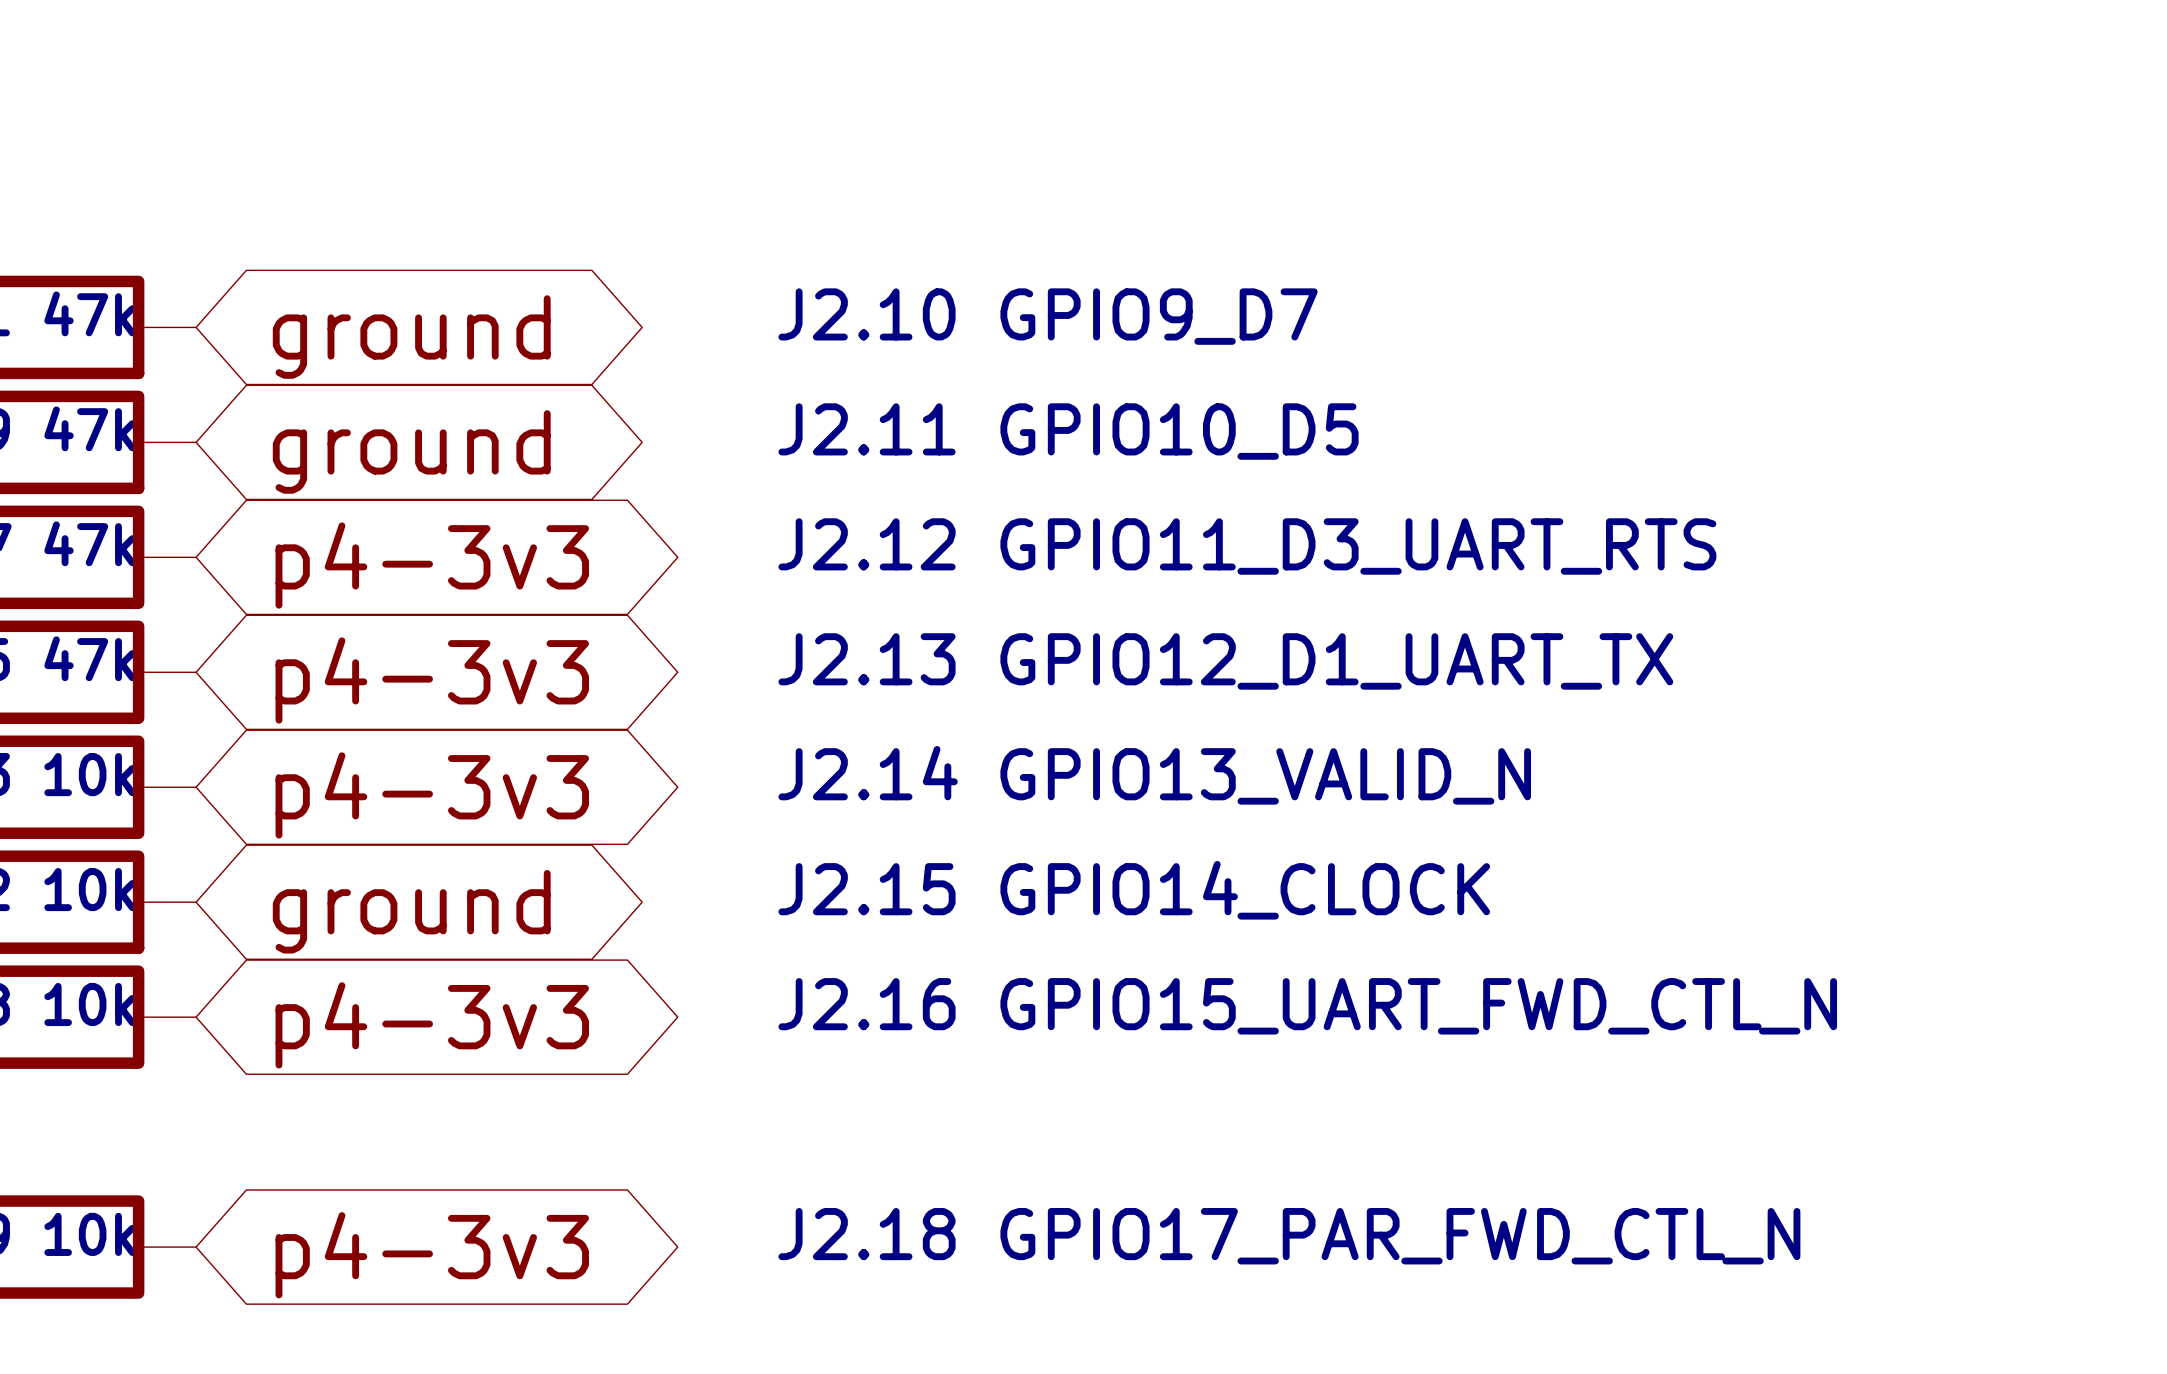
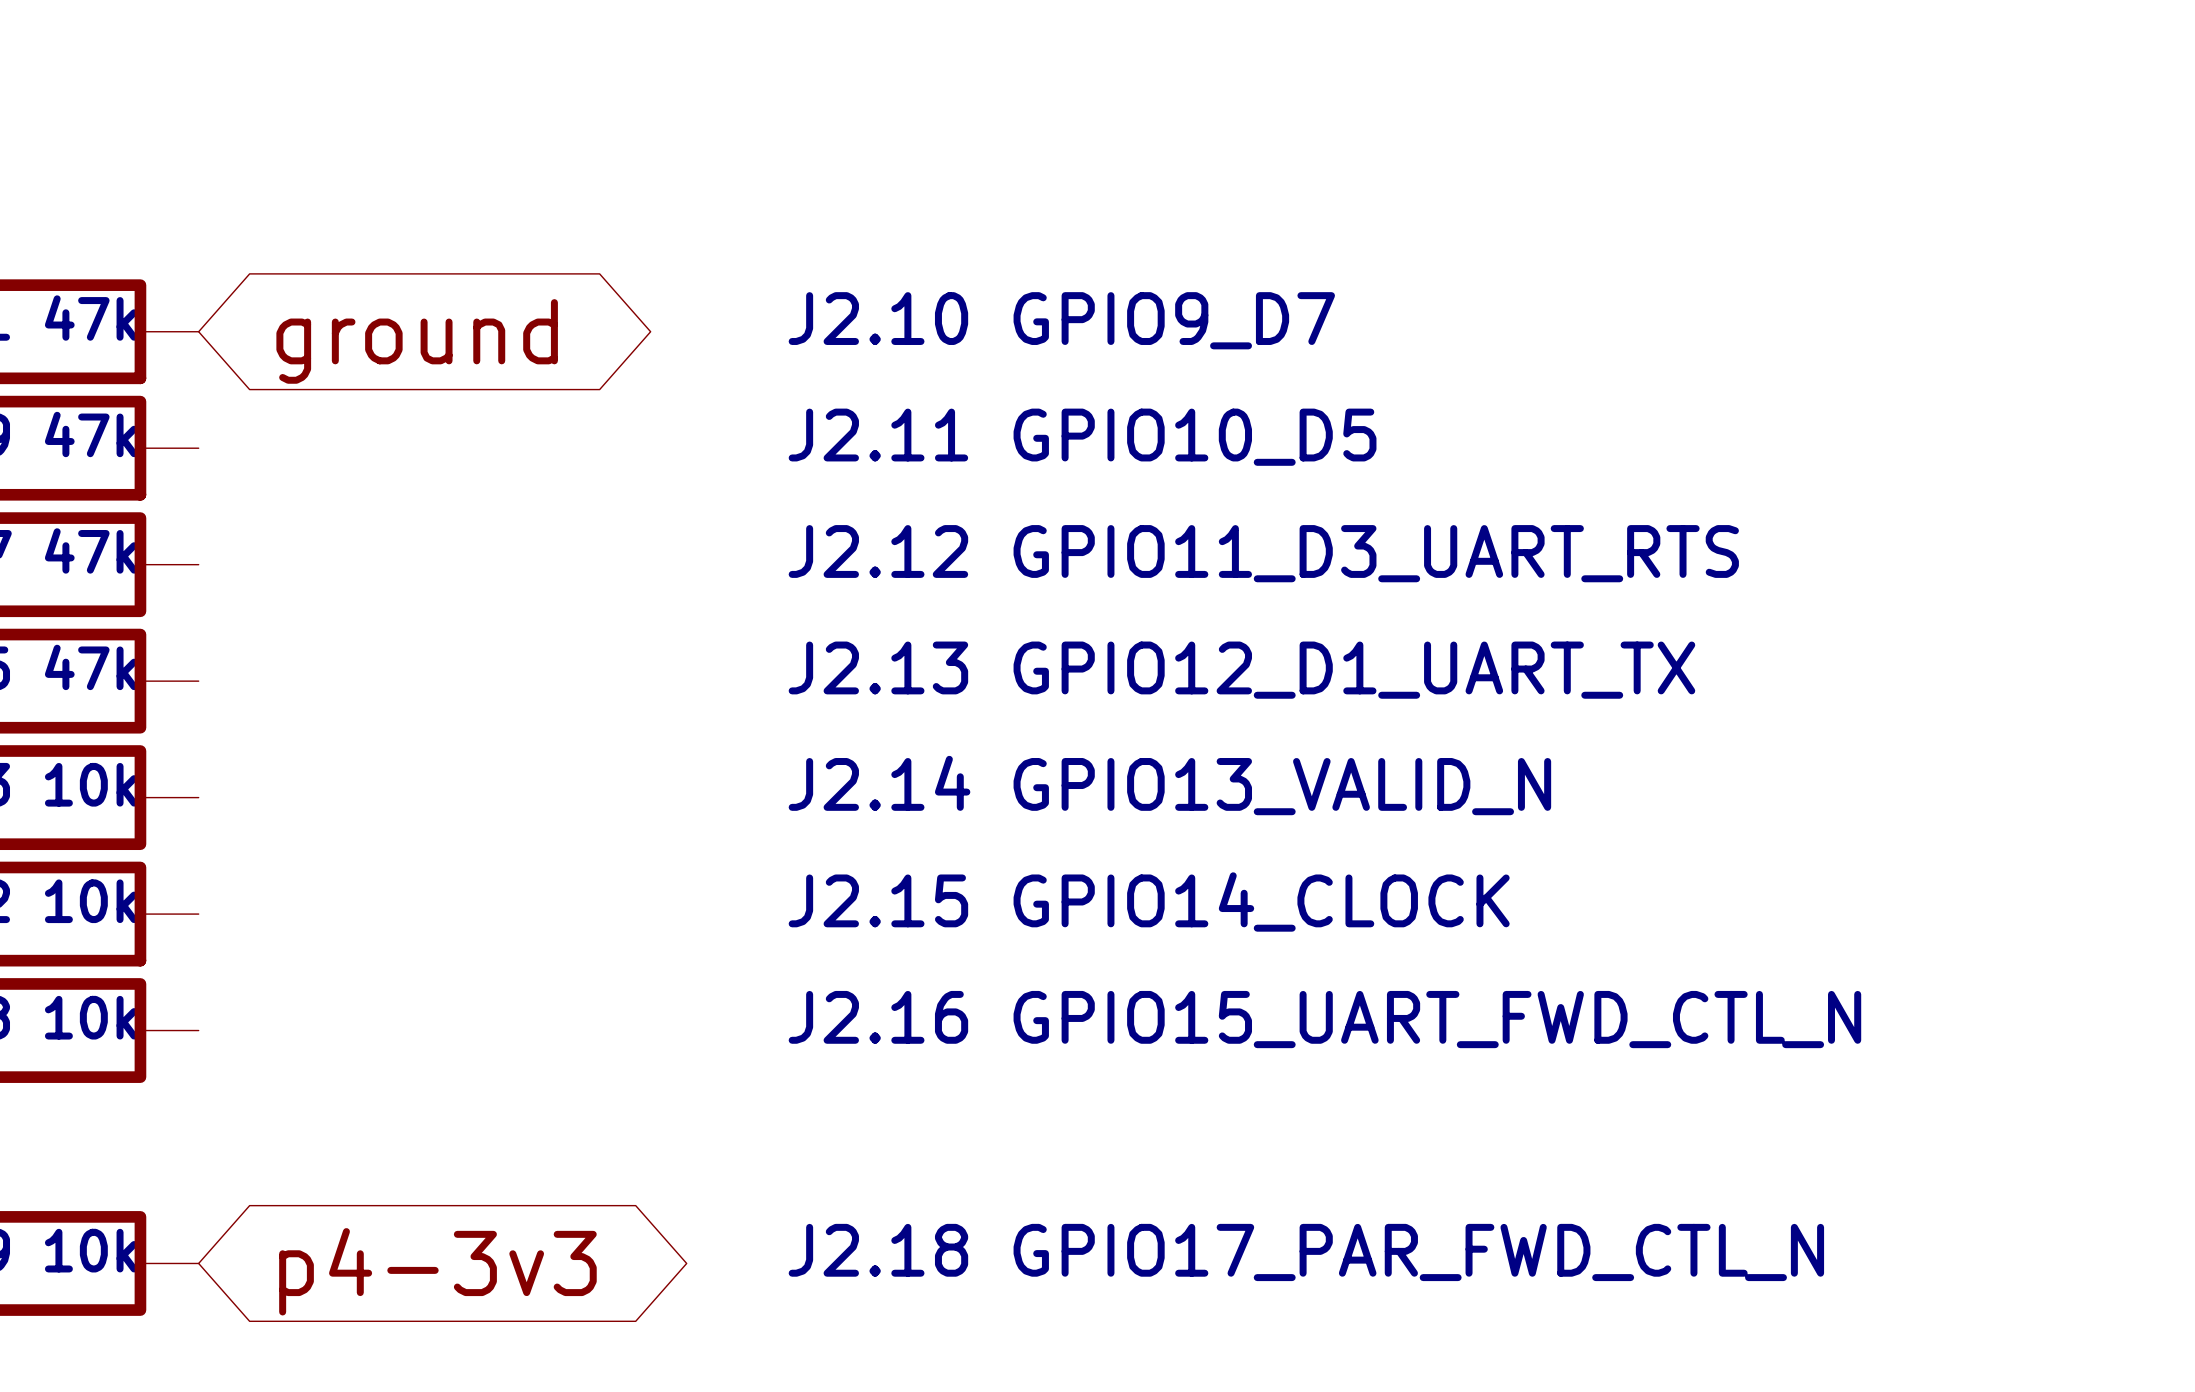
global label: ground (411, 451) -> none
global label: p4-3v3 (432, 565) -> none
global label: p4-3v3 (432, 680) -> none
global label: p4-3v3 (432, 795) -> none
global label: ground (411, 911) -> none
global label: p4-3v3 (432, 1025) -> none

